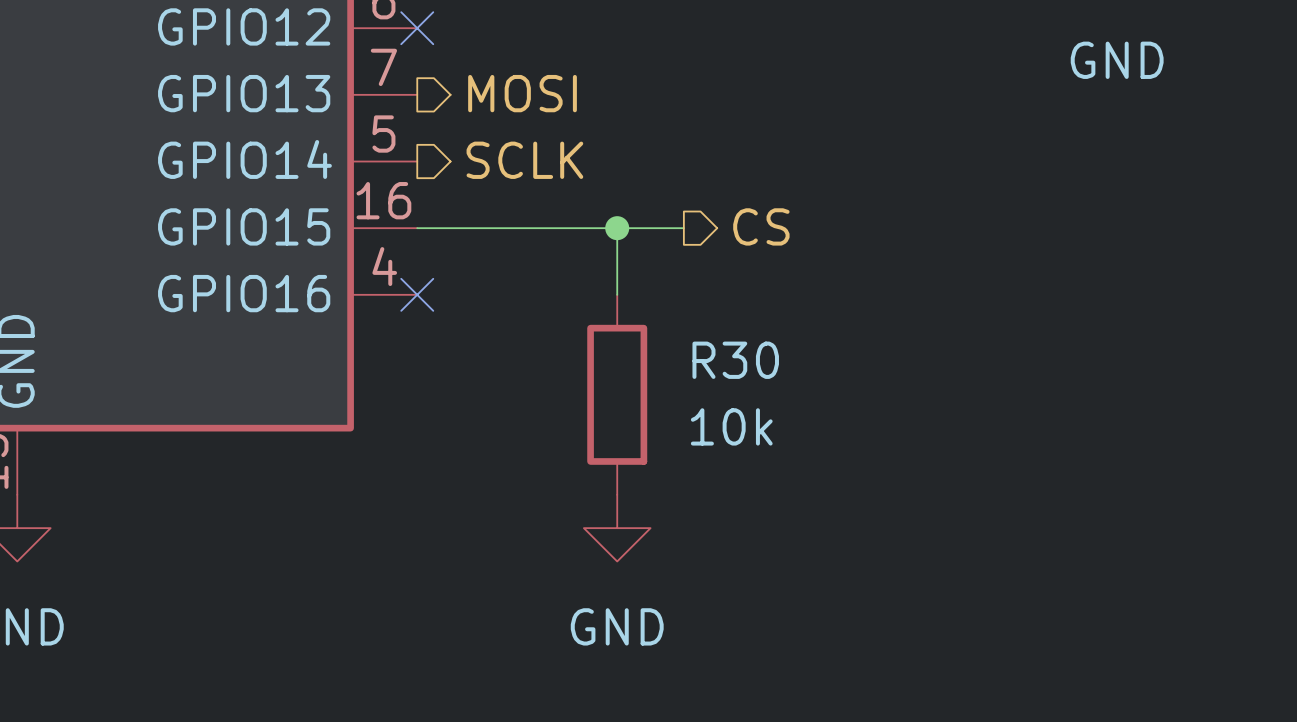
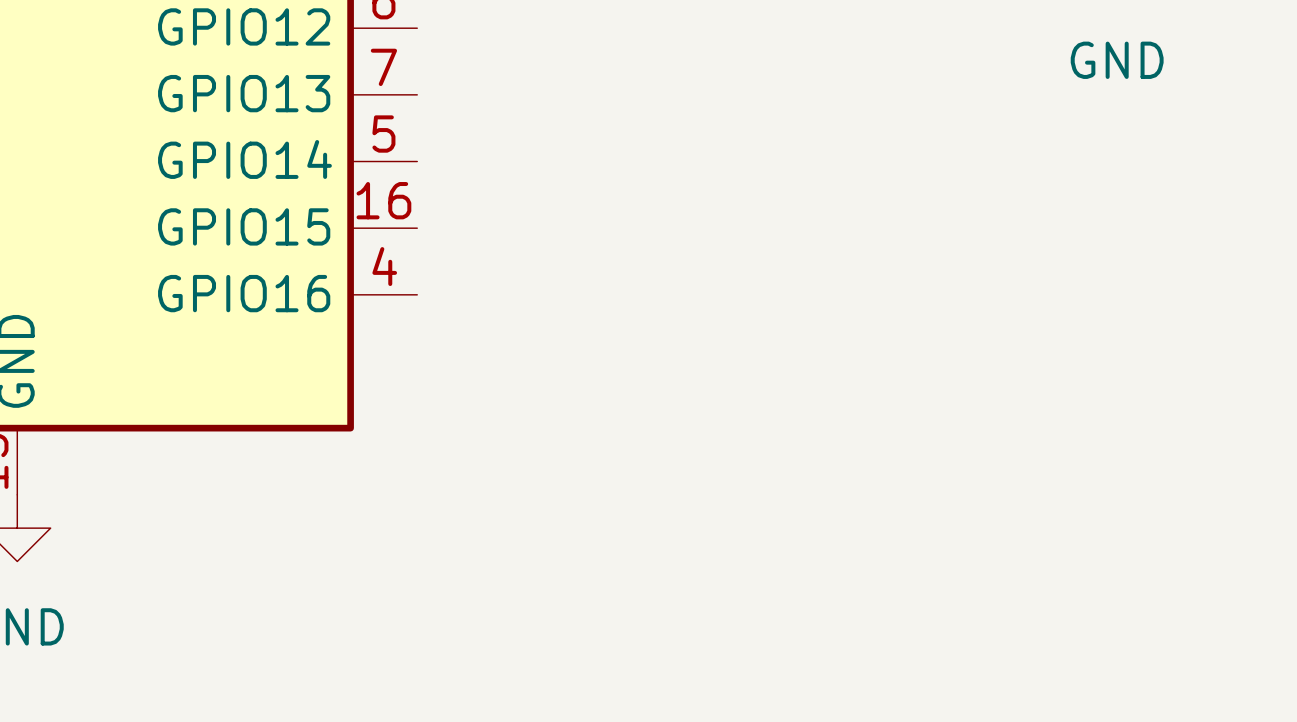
no-connect mark: (417, 28) -> none
hierarchical label: MOSI (522, 93) -> none
hierarchical label: SCLK (524, 160) -> none
hierarchical label: CS (761, 226) -> none
wire: (417, 228) (683, 228) -> none
wire: (617, 228) (617, 294) -> none
junction: (617, 228) -> none
no-connect mark: (417, 294) -> none
R30: 10k (617, 394) -> none
power symbol: GND (617, 528) -> none

